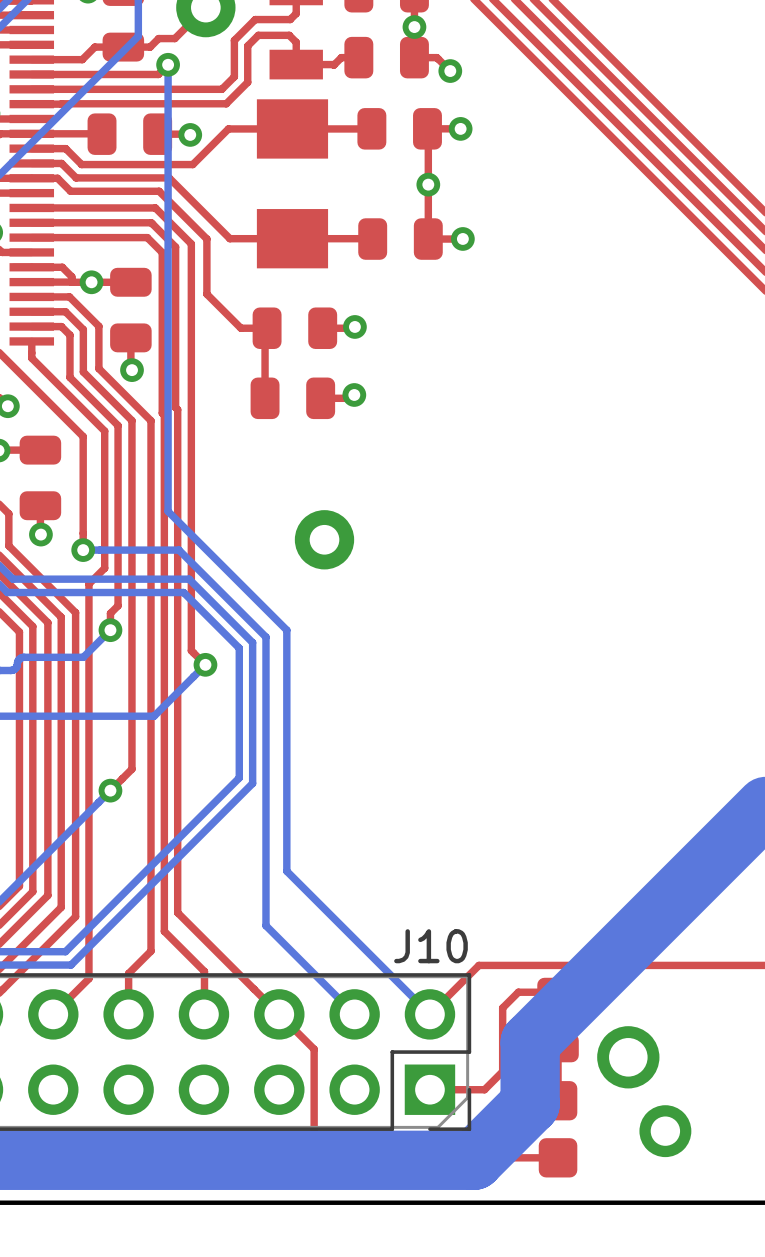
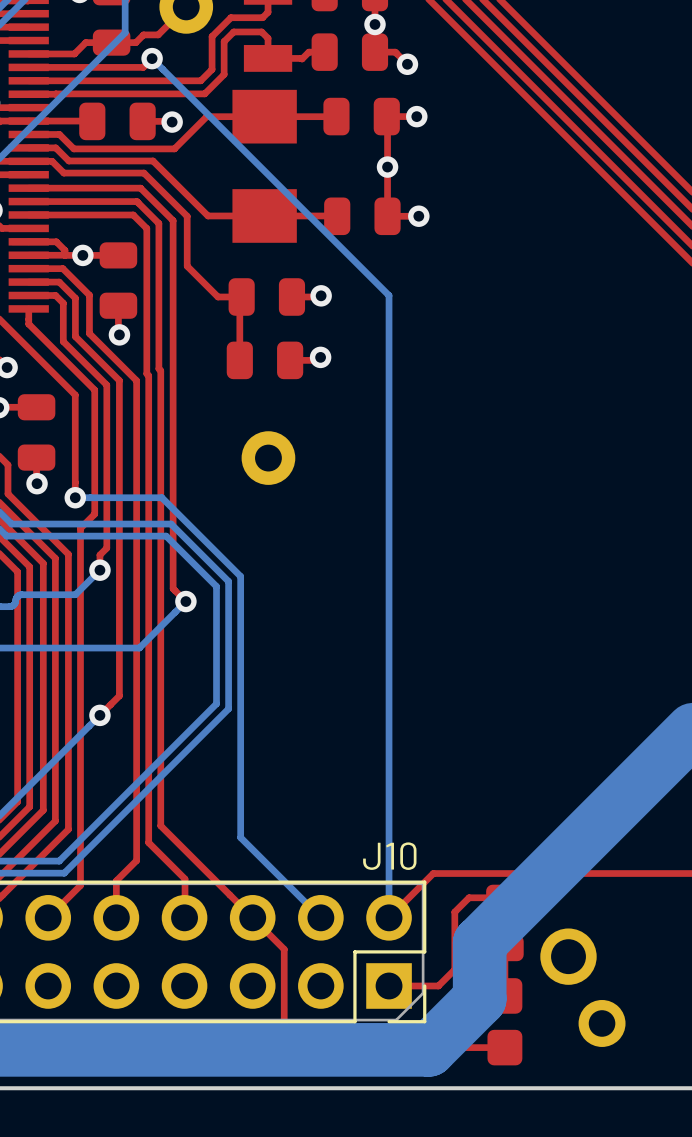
bottom track: (168, 64) (168, 511) (286, 630) (286, 871) (429, 1014) -> (152, 58) (389, 295) (389, 917)
part position: (324, 539) -> (268, 458)

